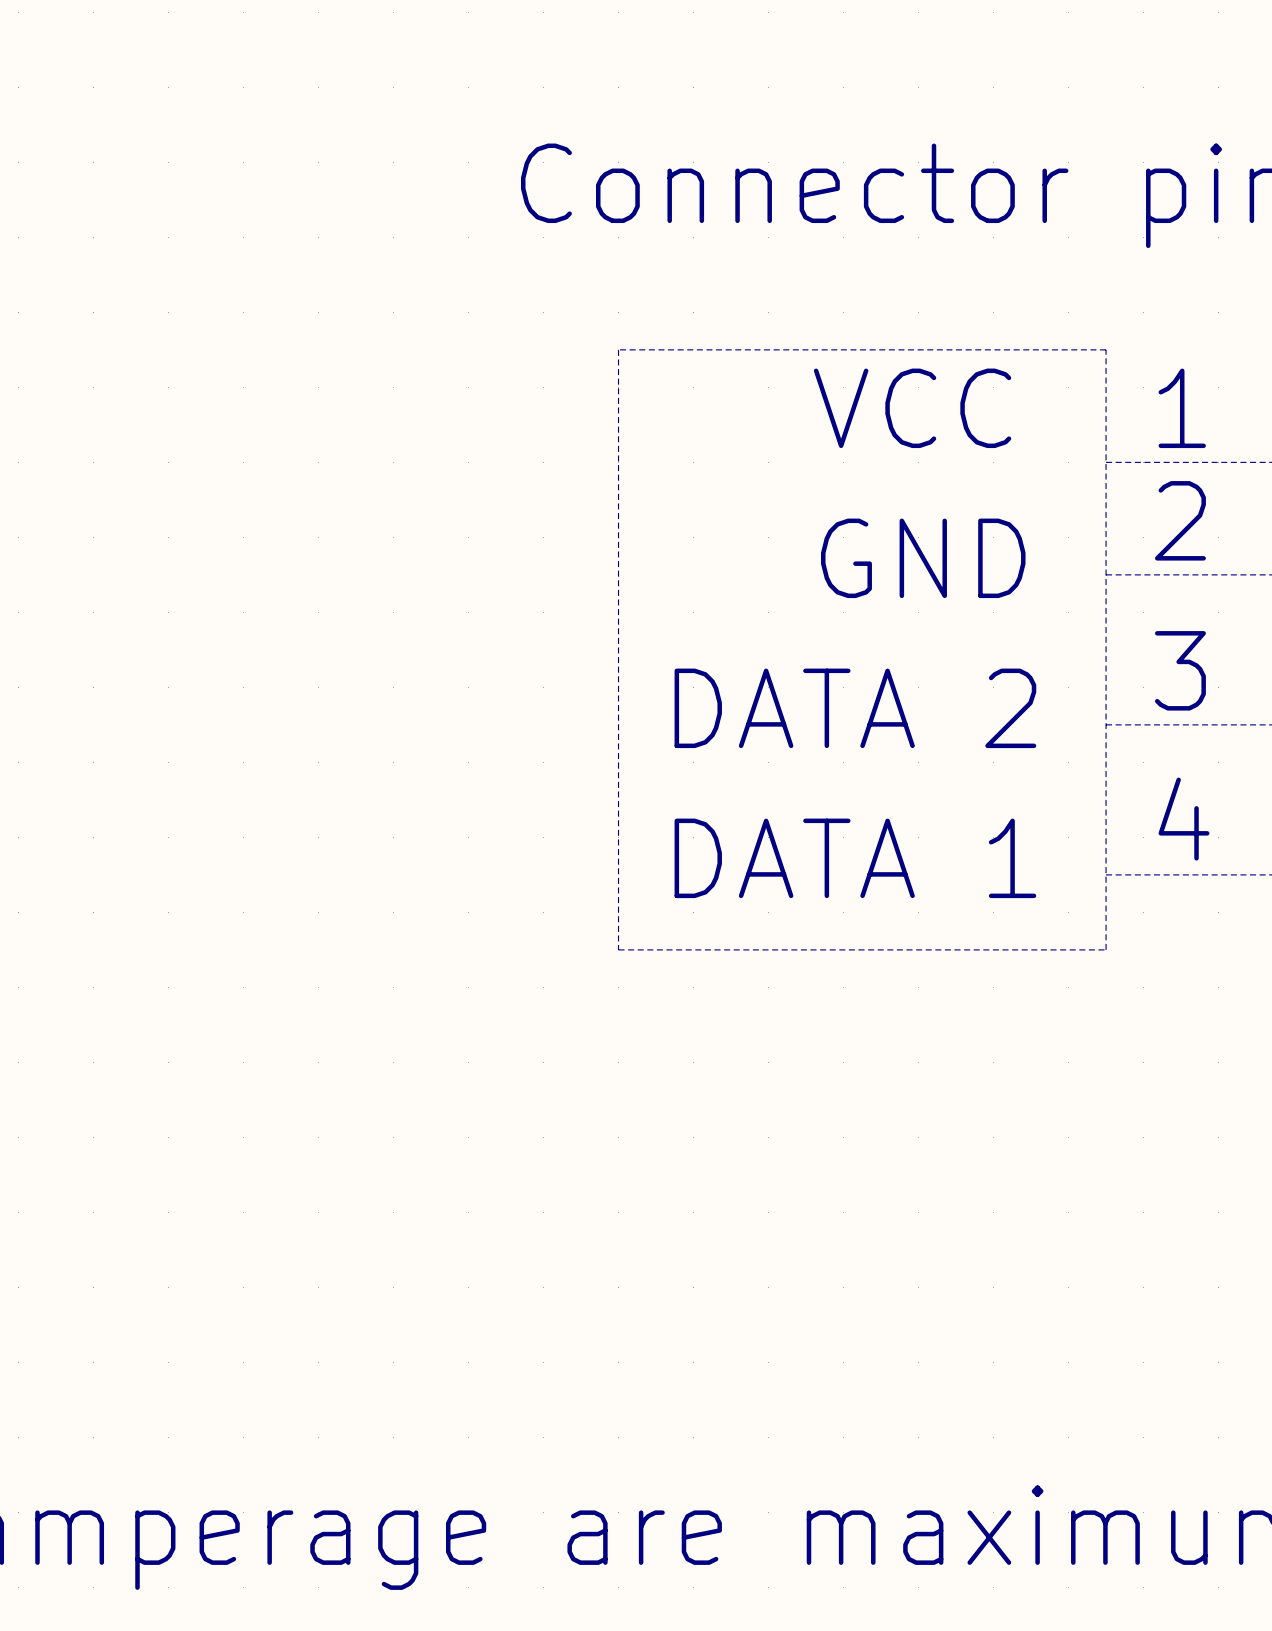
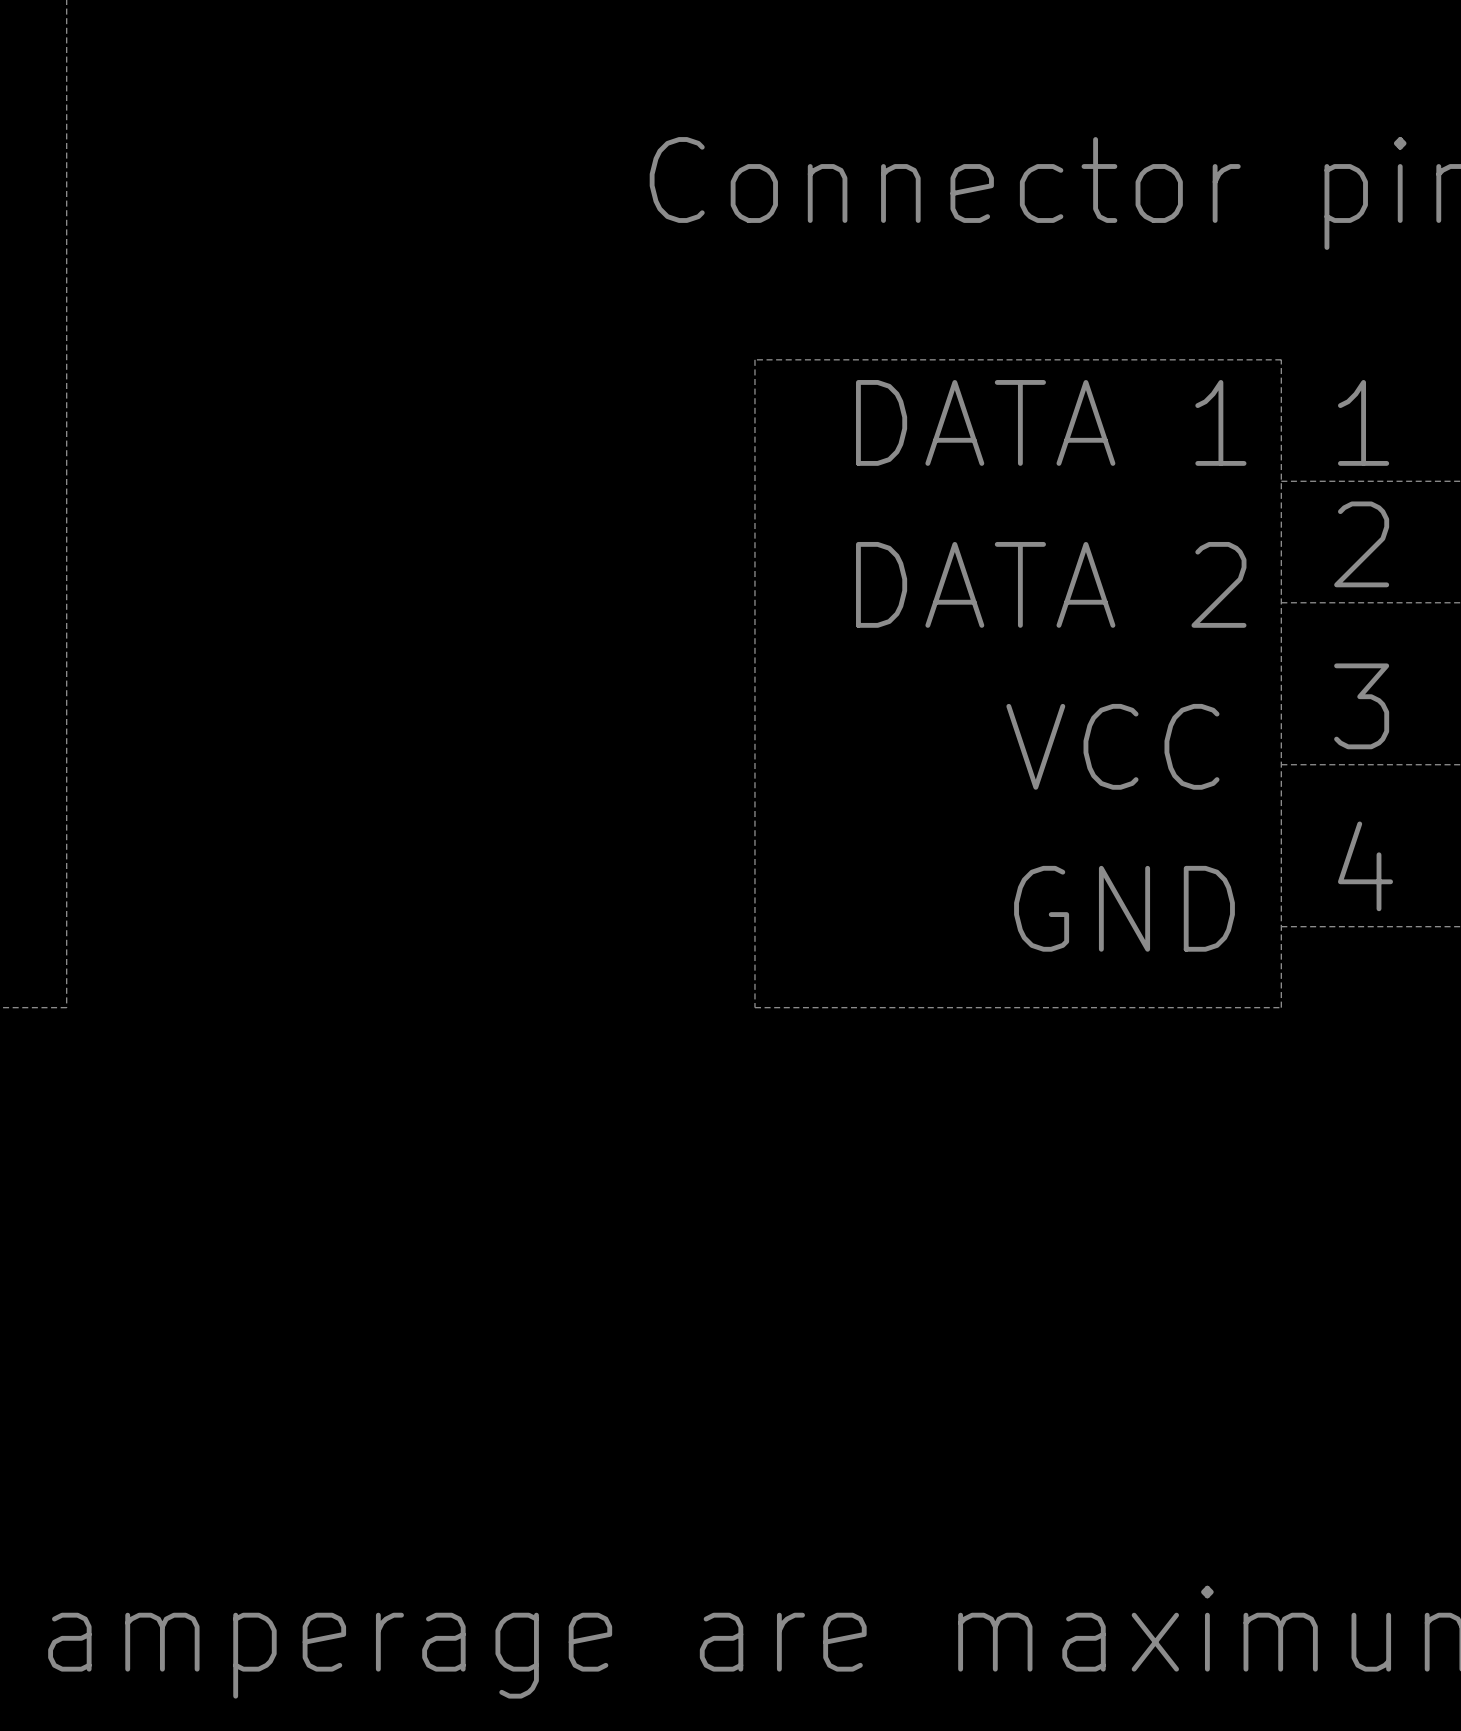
text position: VCC (912, 408) -> VCC (1112, 746)
text position: GND (923, 558) -> GND (1124, 908)
text position: DATA 2 (855, 708) -> DATA 2 (1051, 584)
text position: DATA 1 (855, 858) -> DATA 1 (1051, 422)

